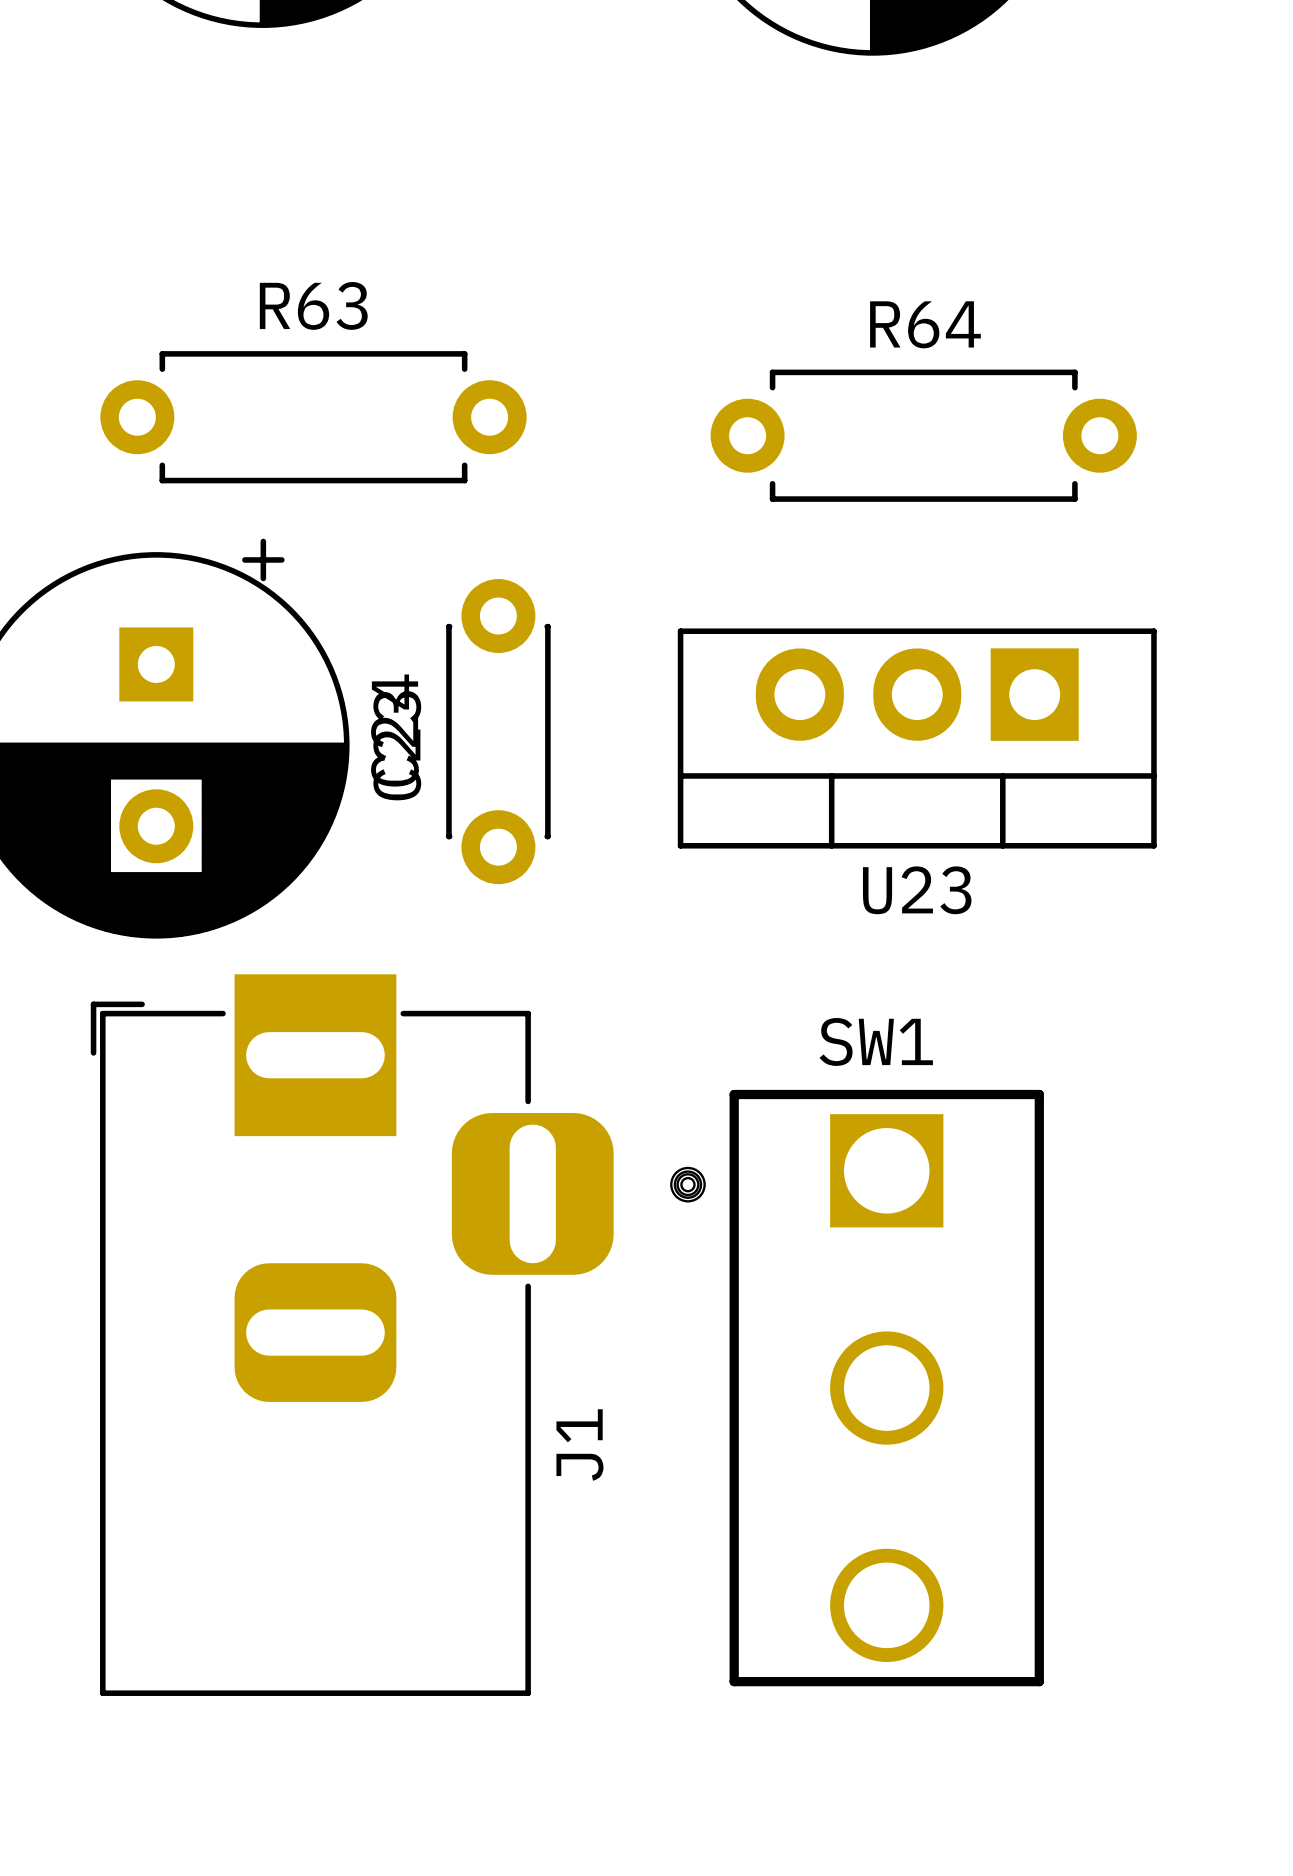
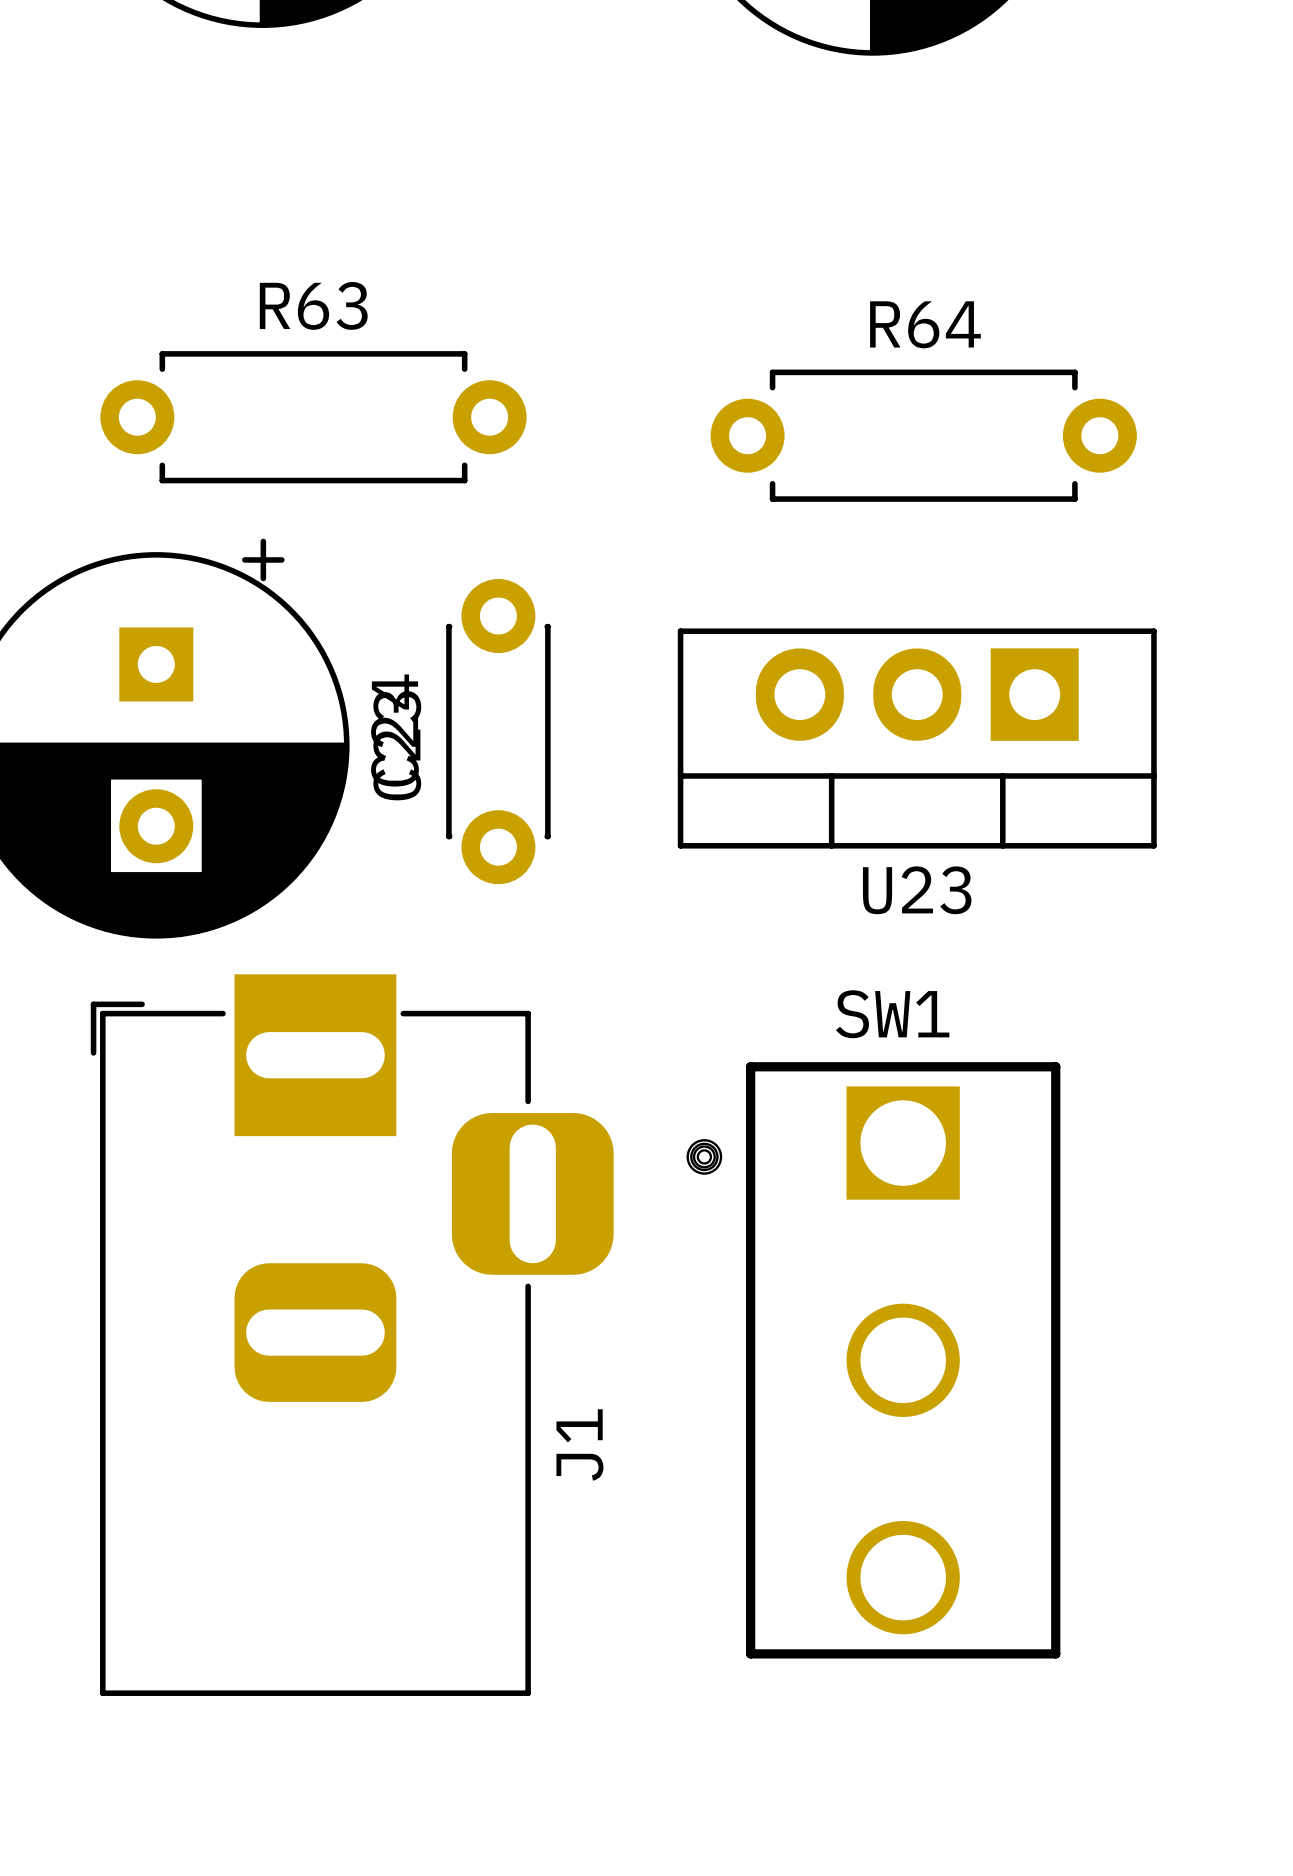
SW1 position: (857, 1388) -> (873, 1360)

